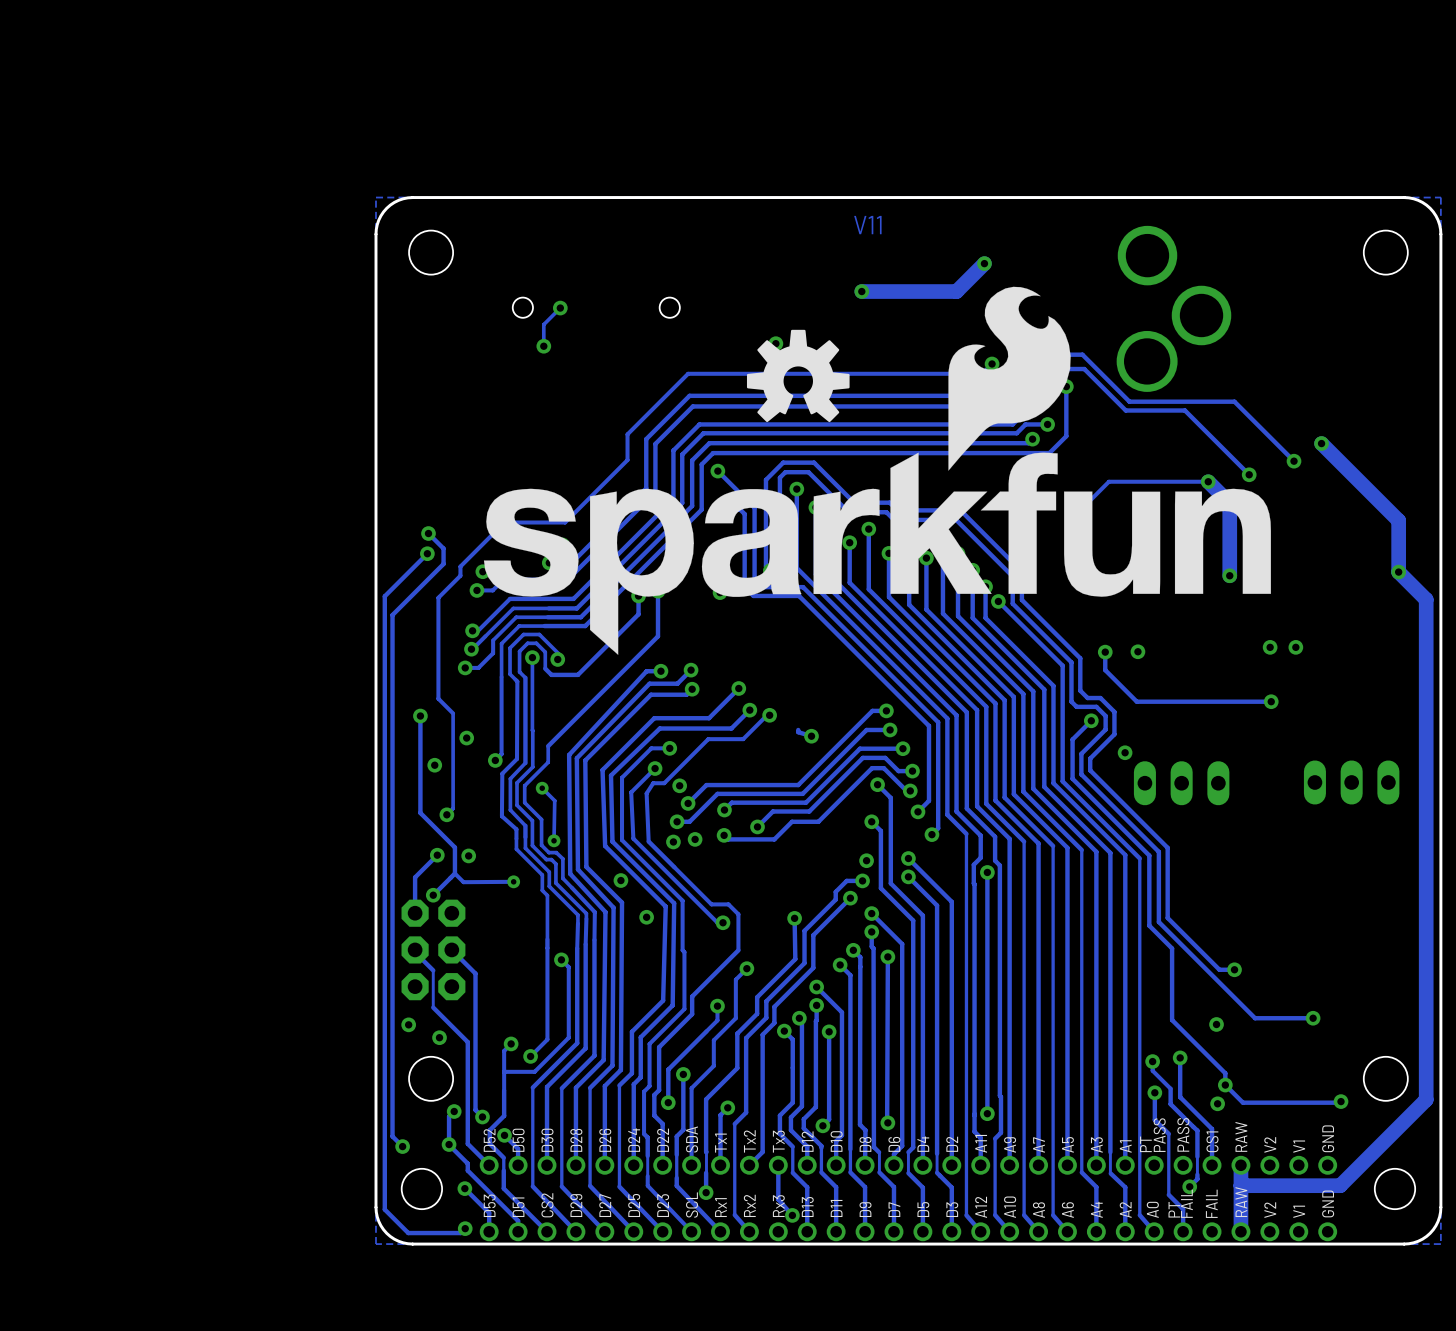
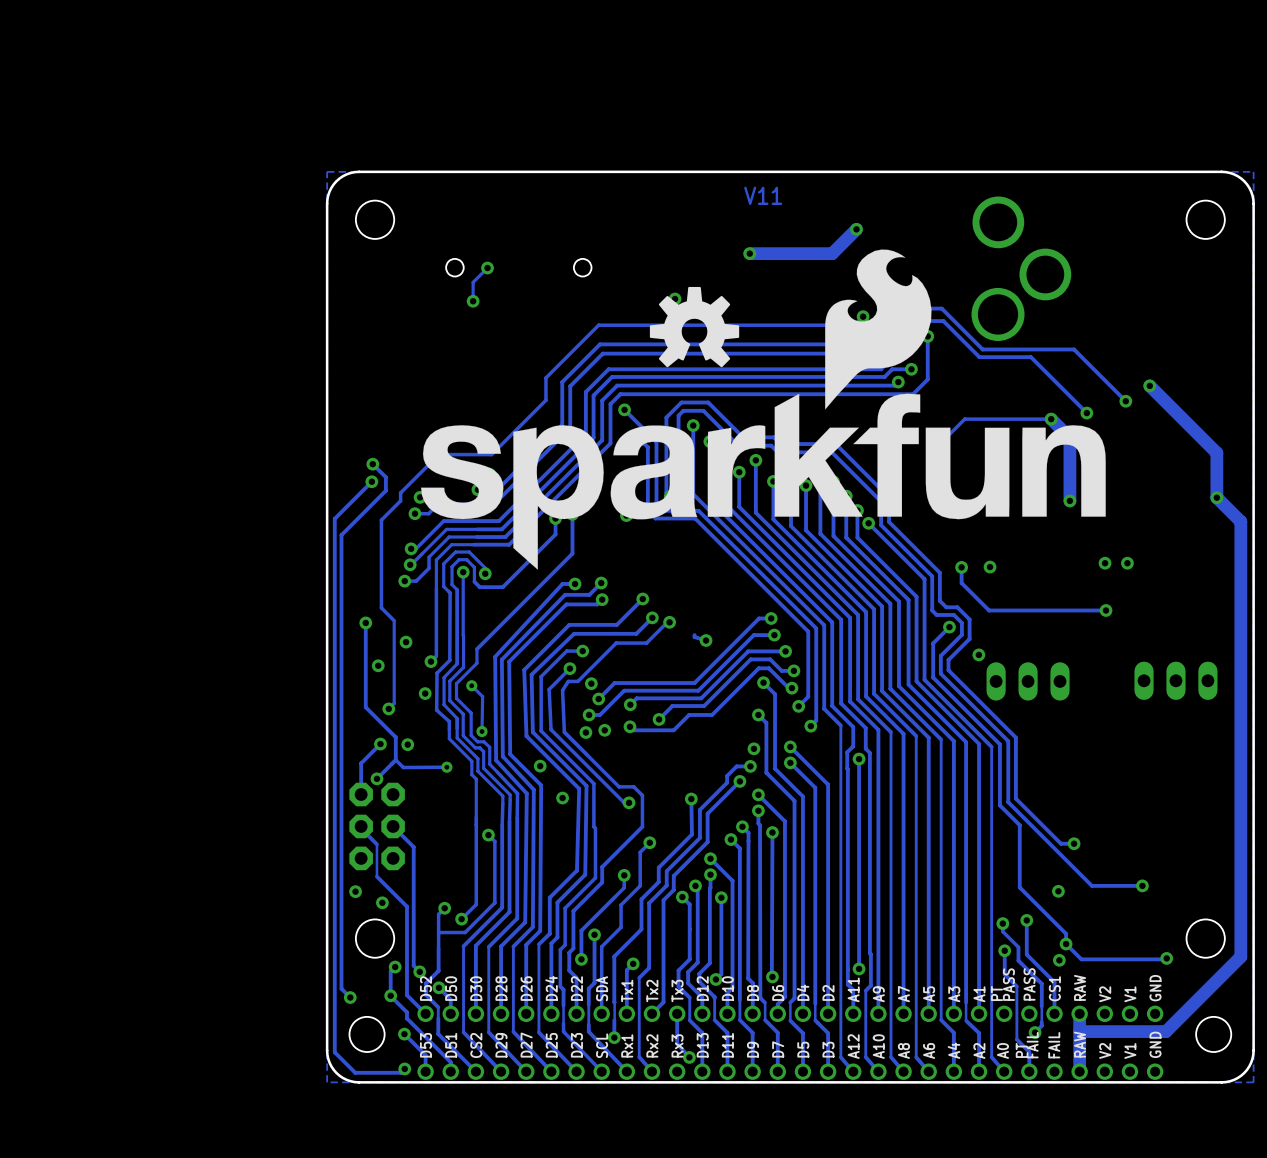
via: none -> (425, 693)

